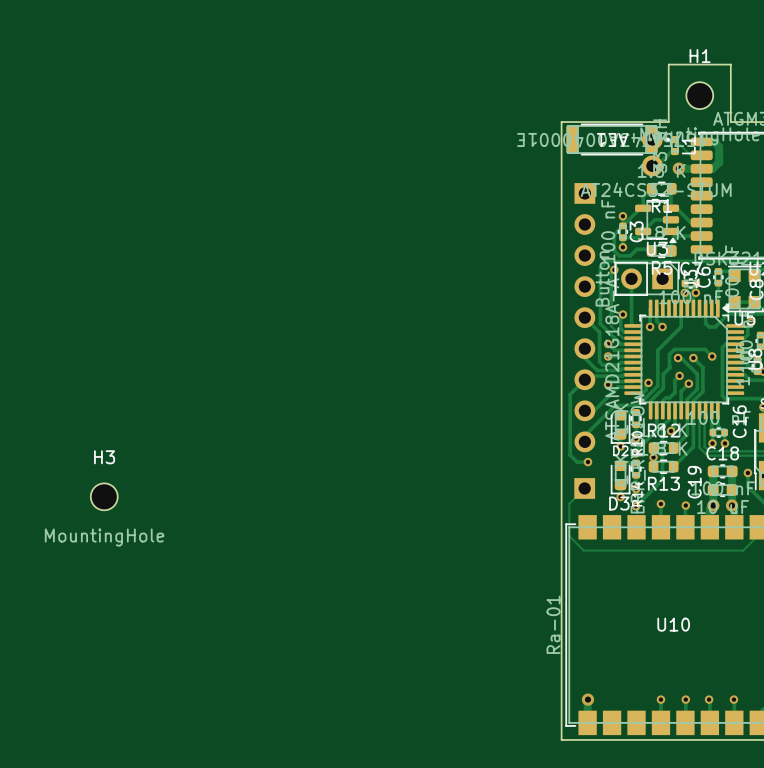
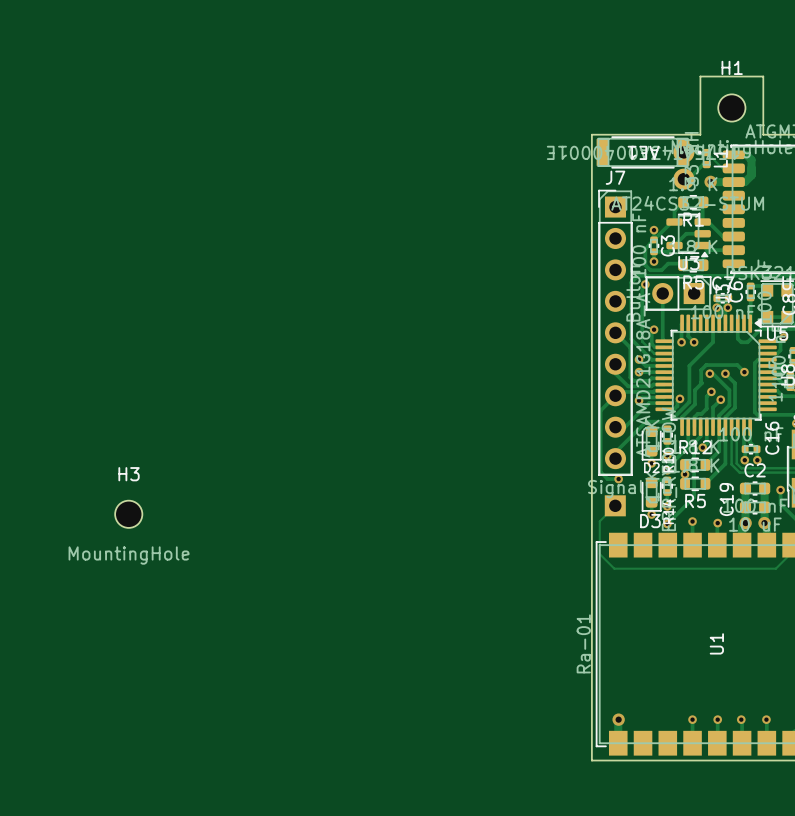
J7 side: bottom (584, 317) -> top (615, 332)
C18 name: C18 (722, 453) -> C2 (755, 470)
R13 name: R13 (663, 483) -> R5 (695, 501)
U10 name: U10 (673, 624) -> U1 (716, 643)

